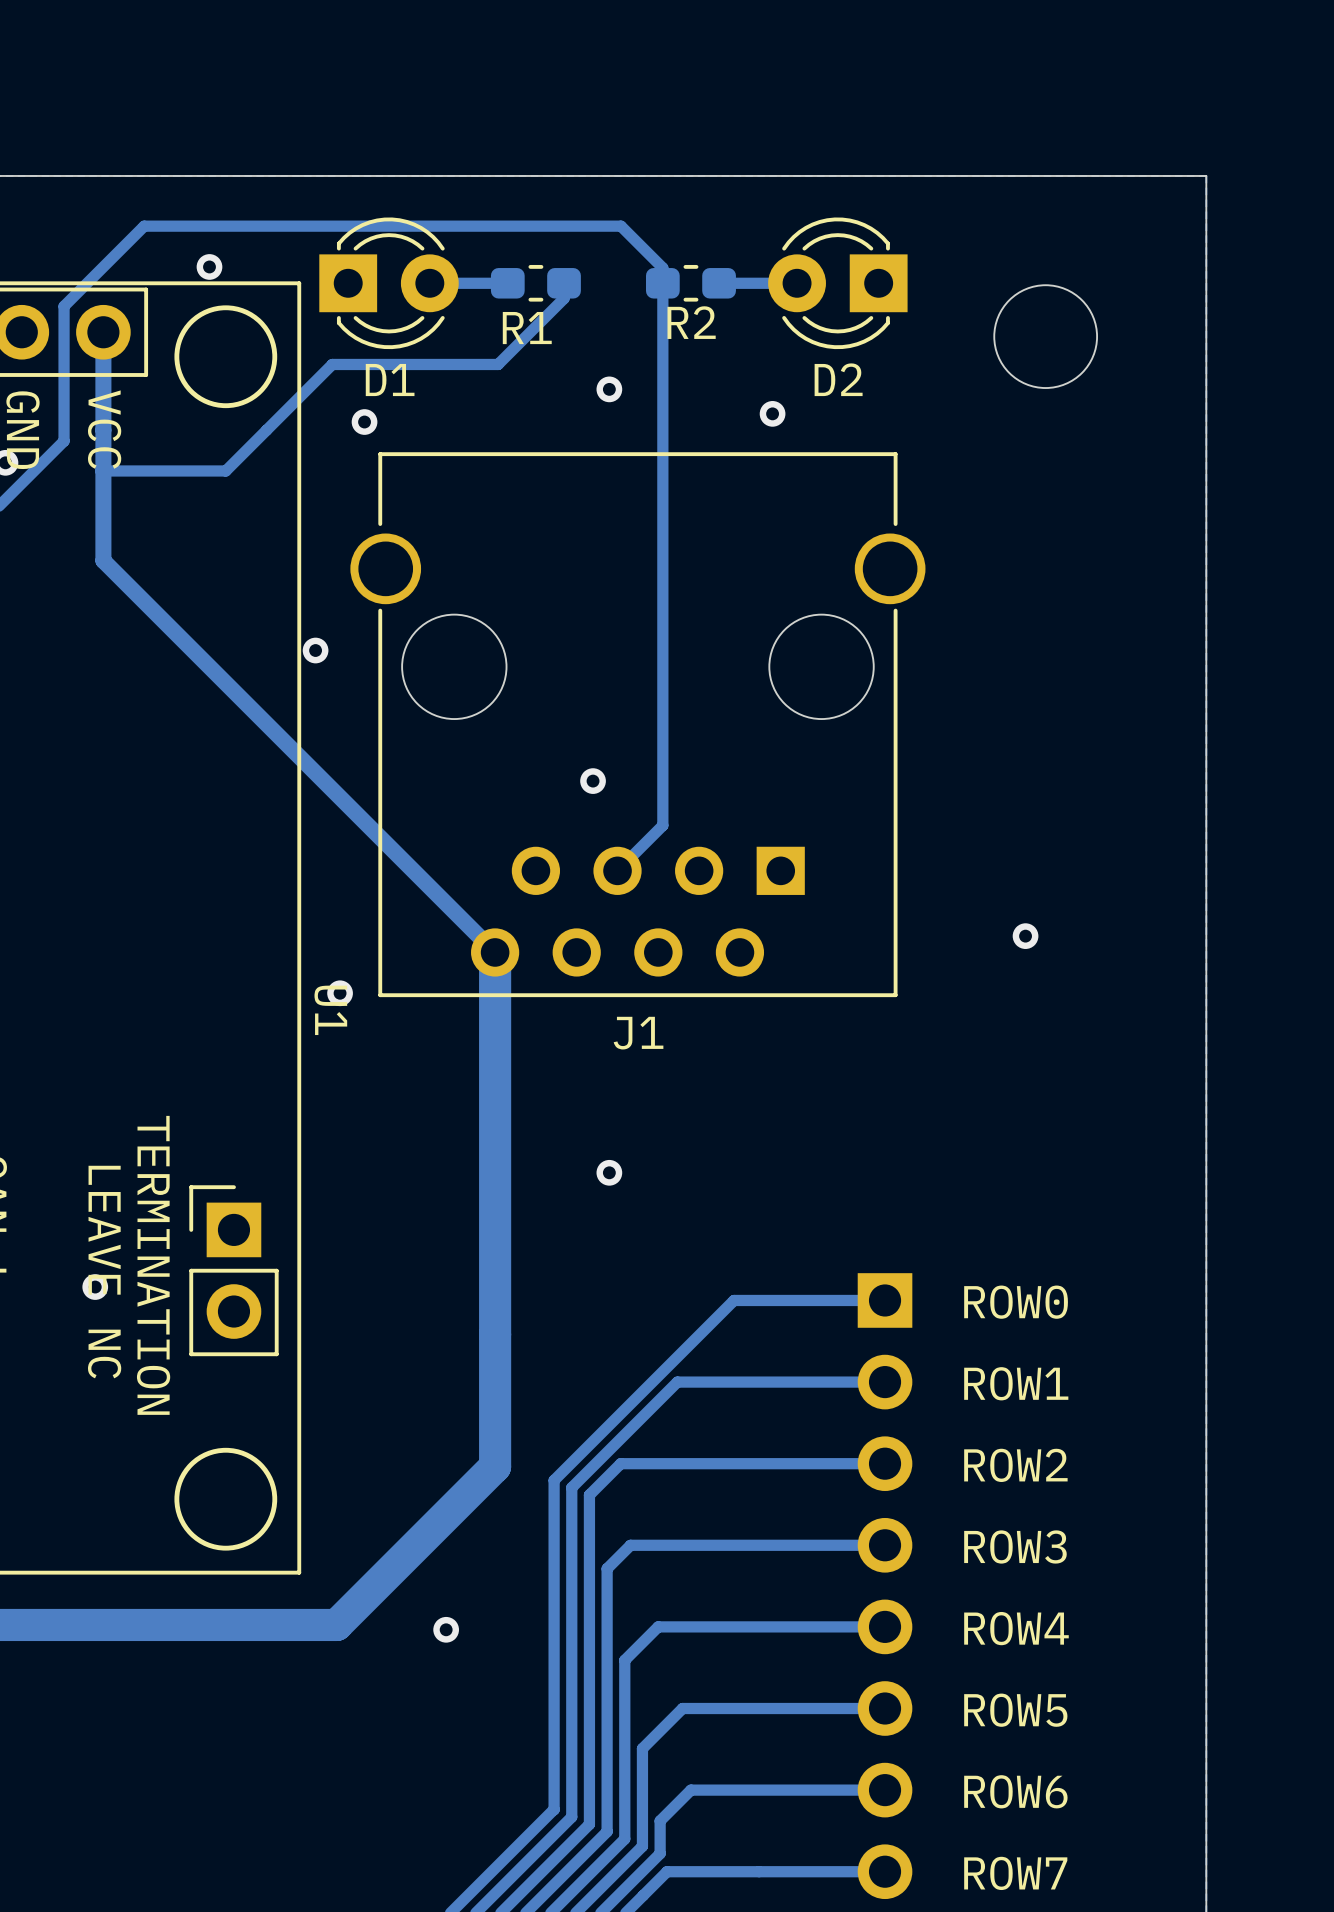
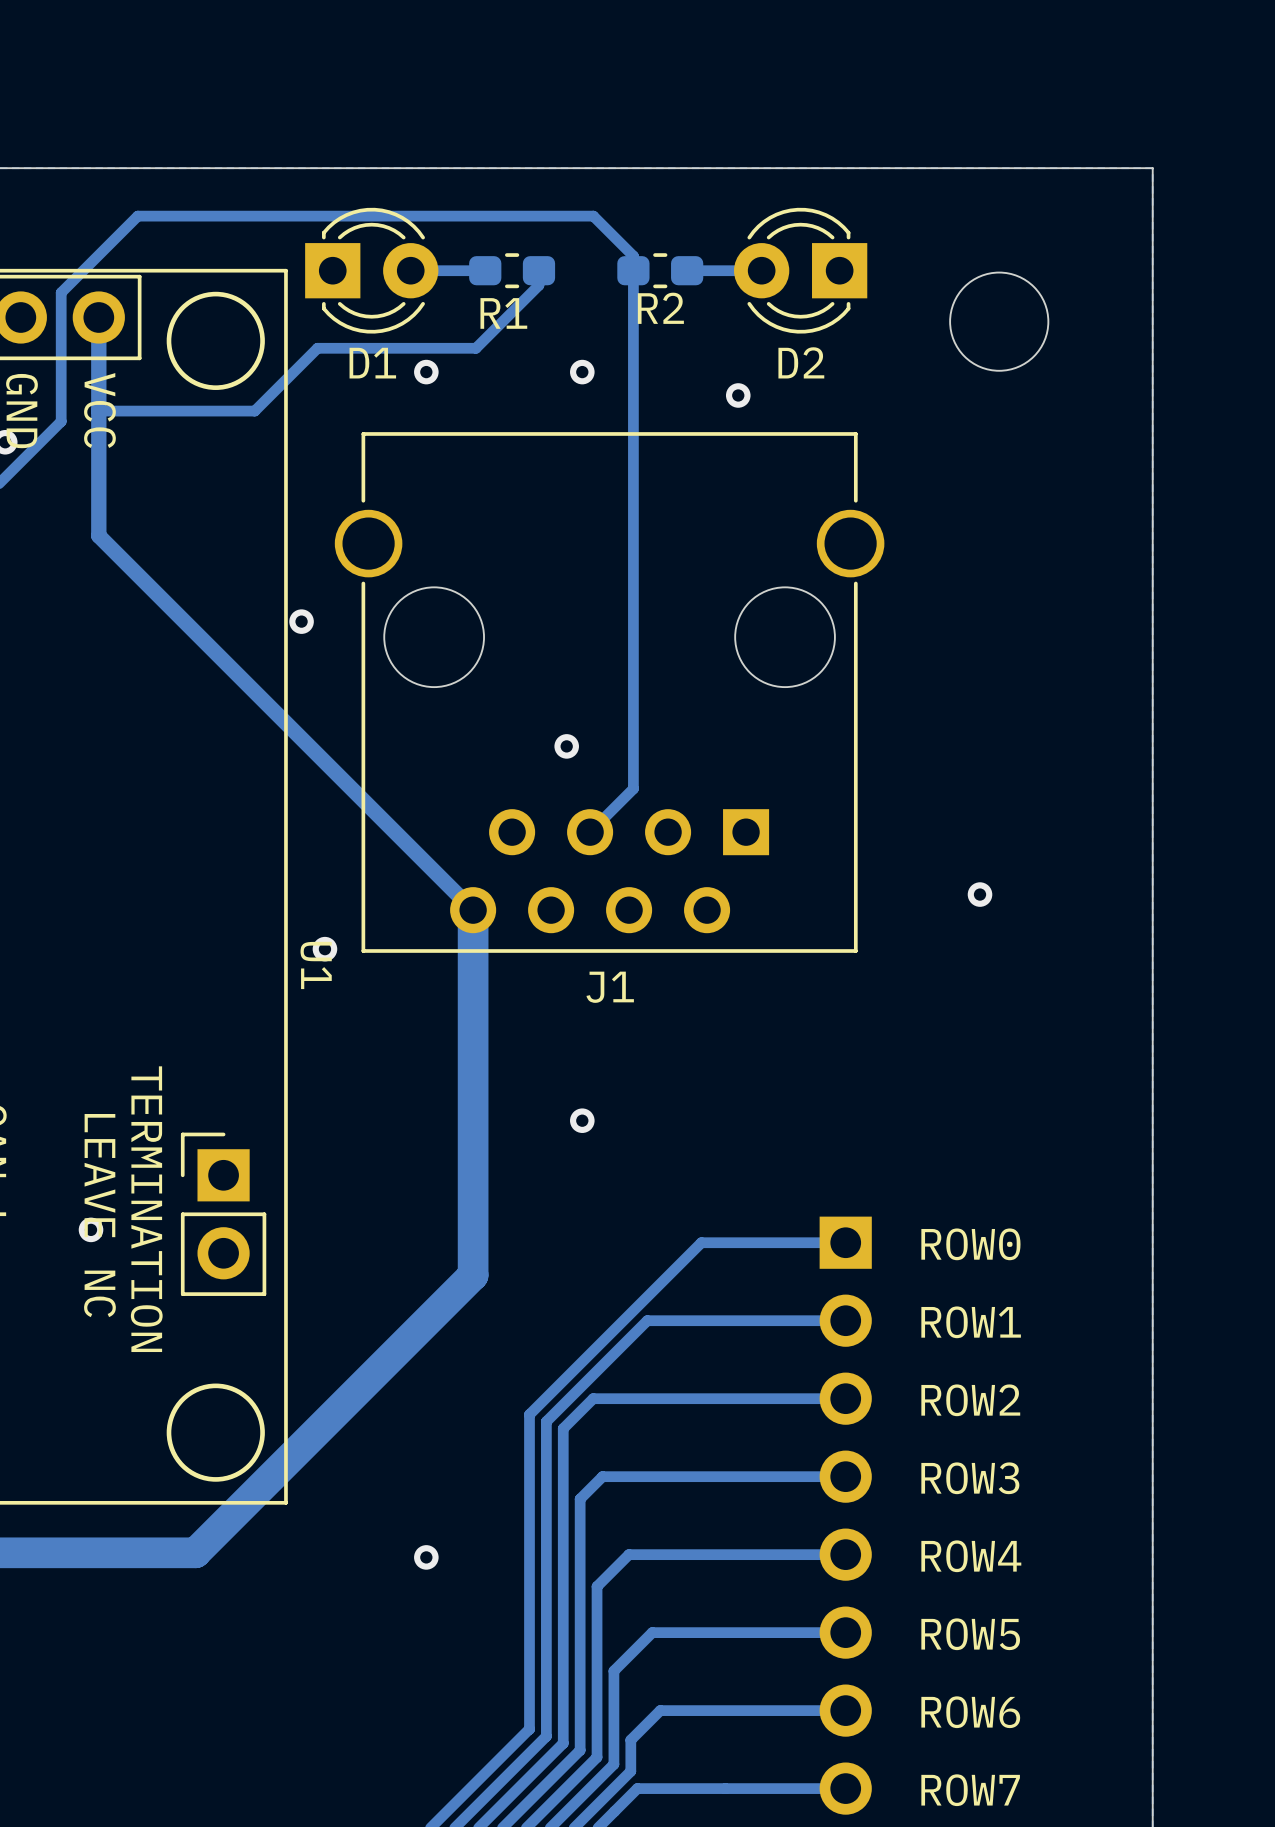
via: (209, 266) -> none
via position: (364, 422) -> (426, 372)
track: (266, 430) (225, 470) (103, 470) -> (254, 411) (98, 411)
track: (495, 1334) (495, 1466) (336, 1624) (204, 1624) -> (473, 1275) (195, 1552)

